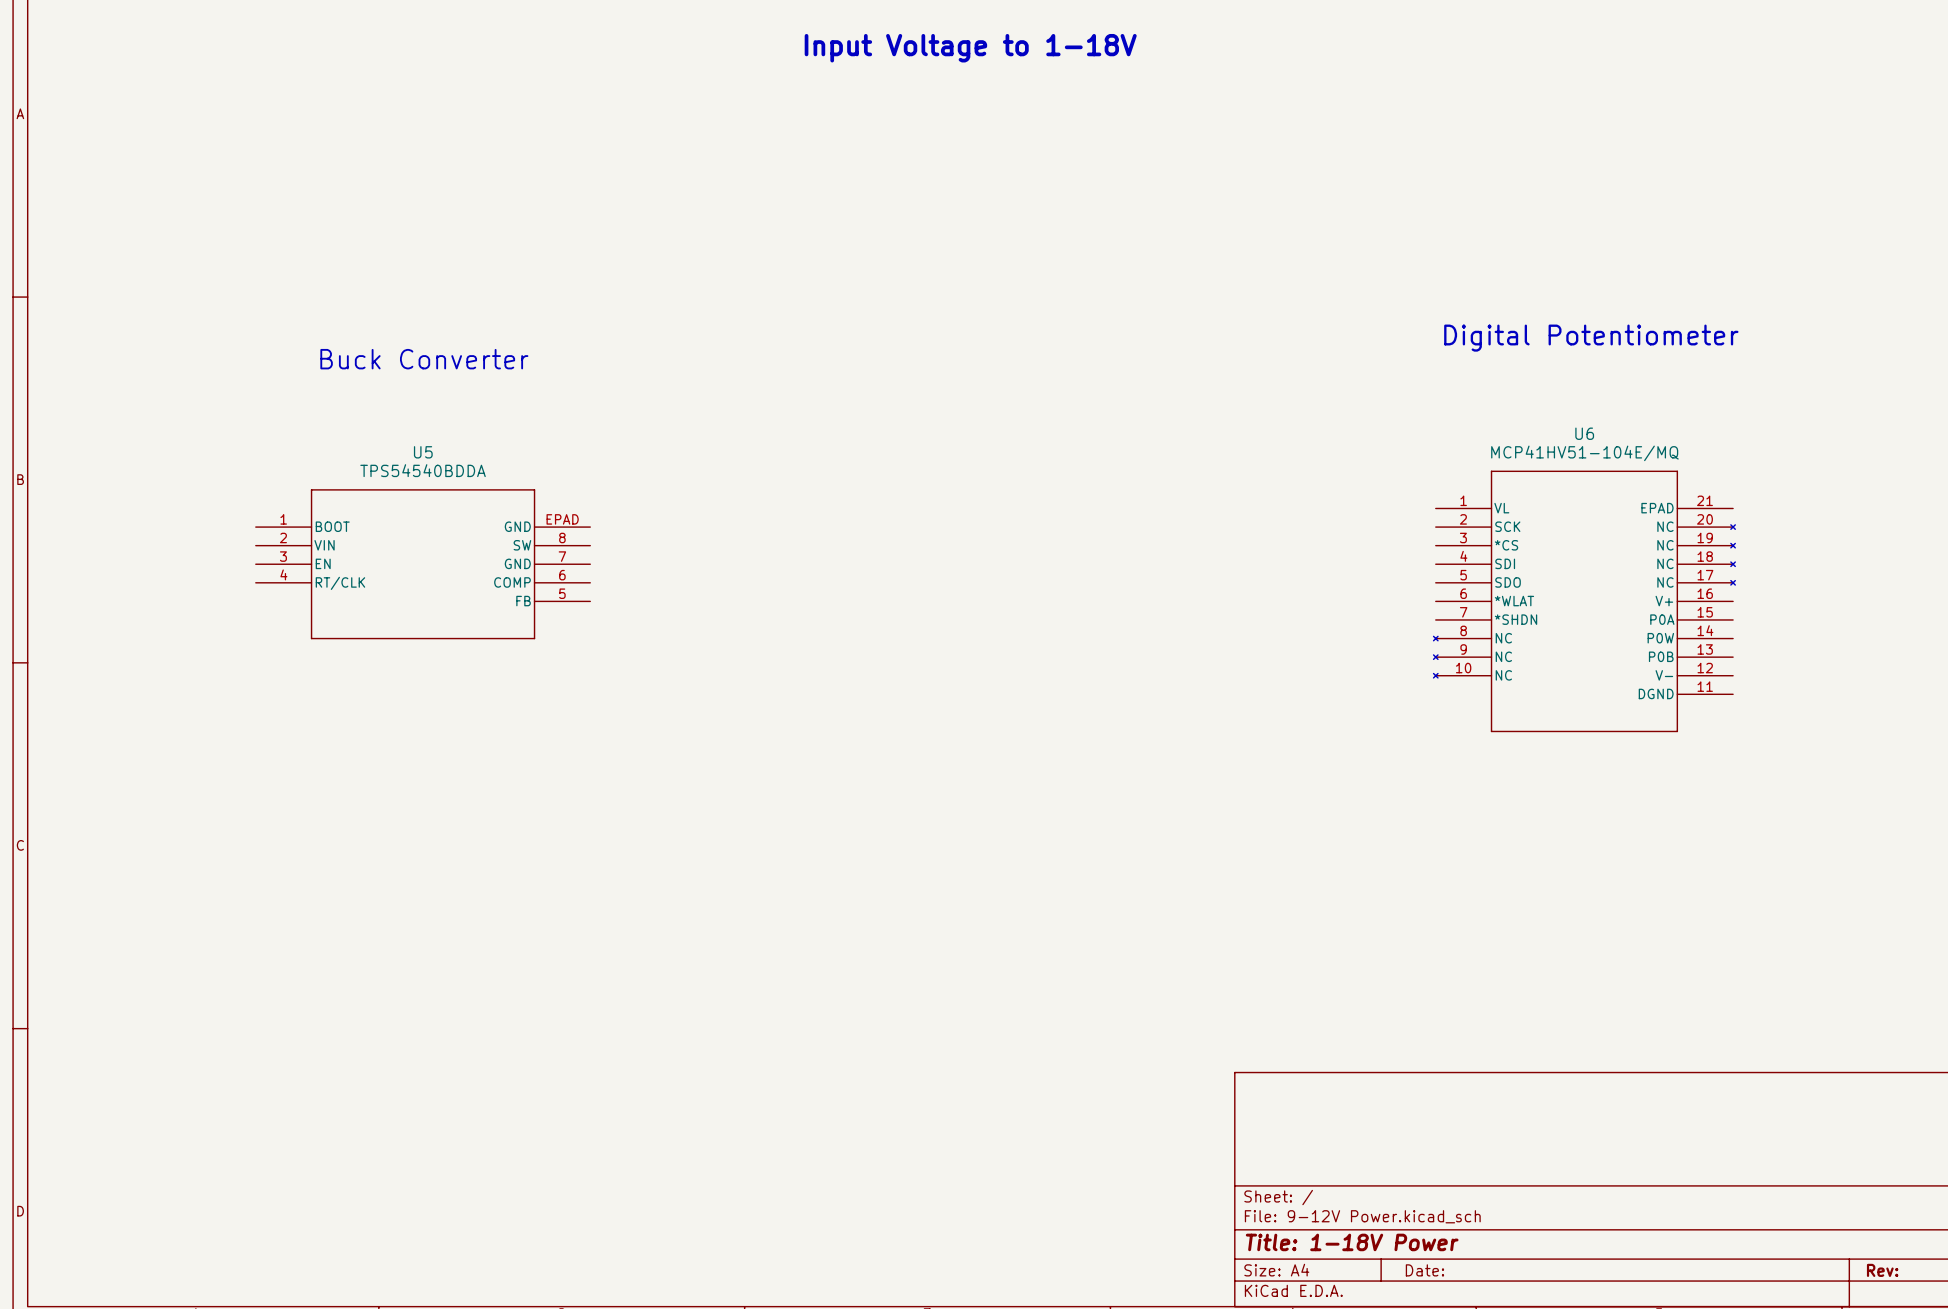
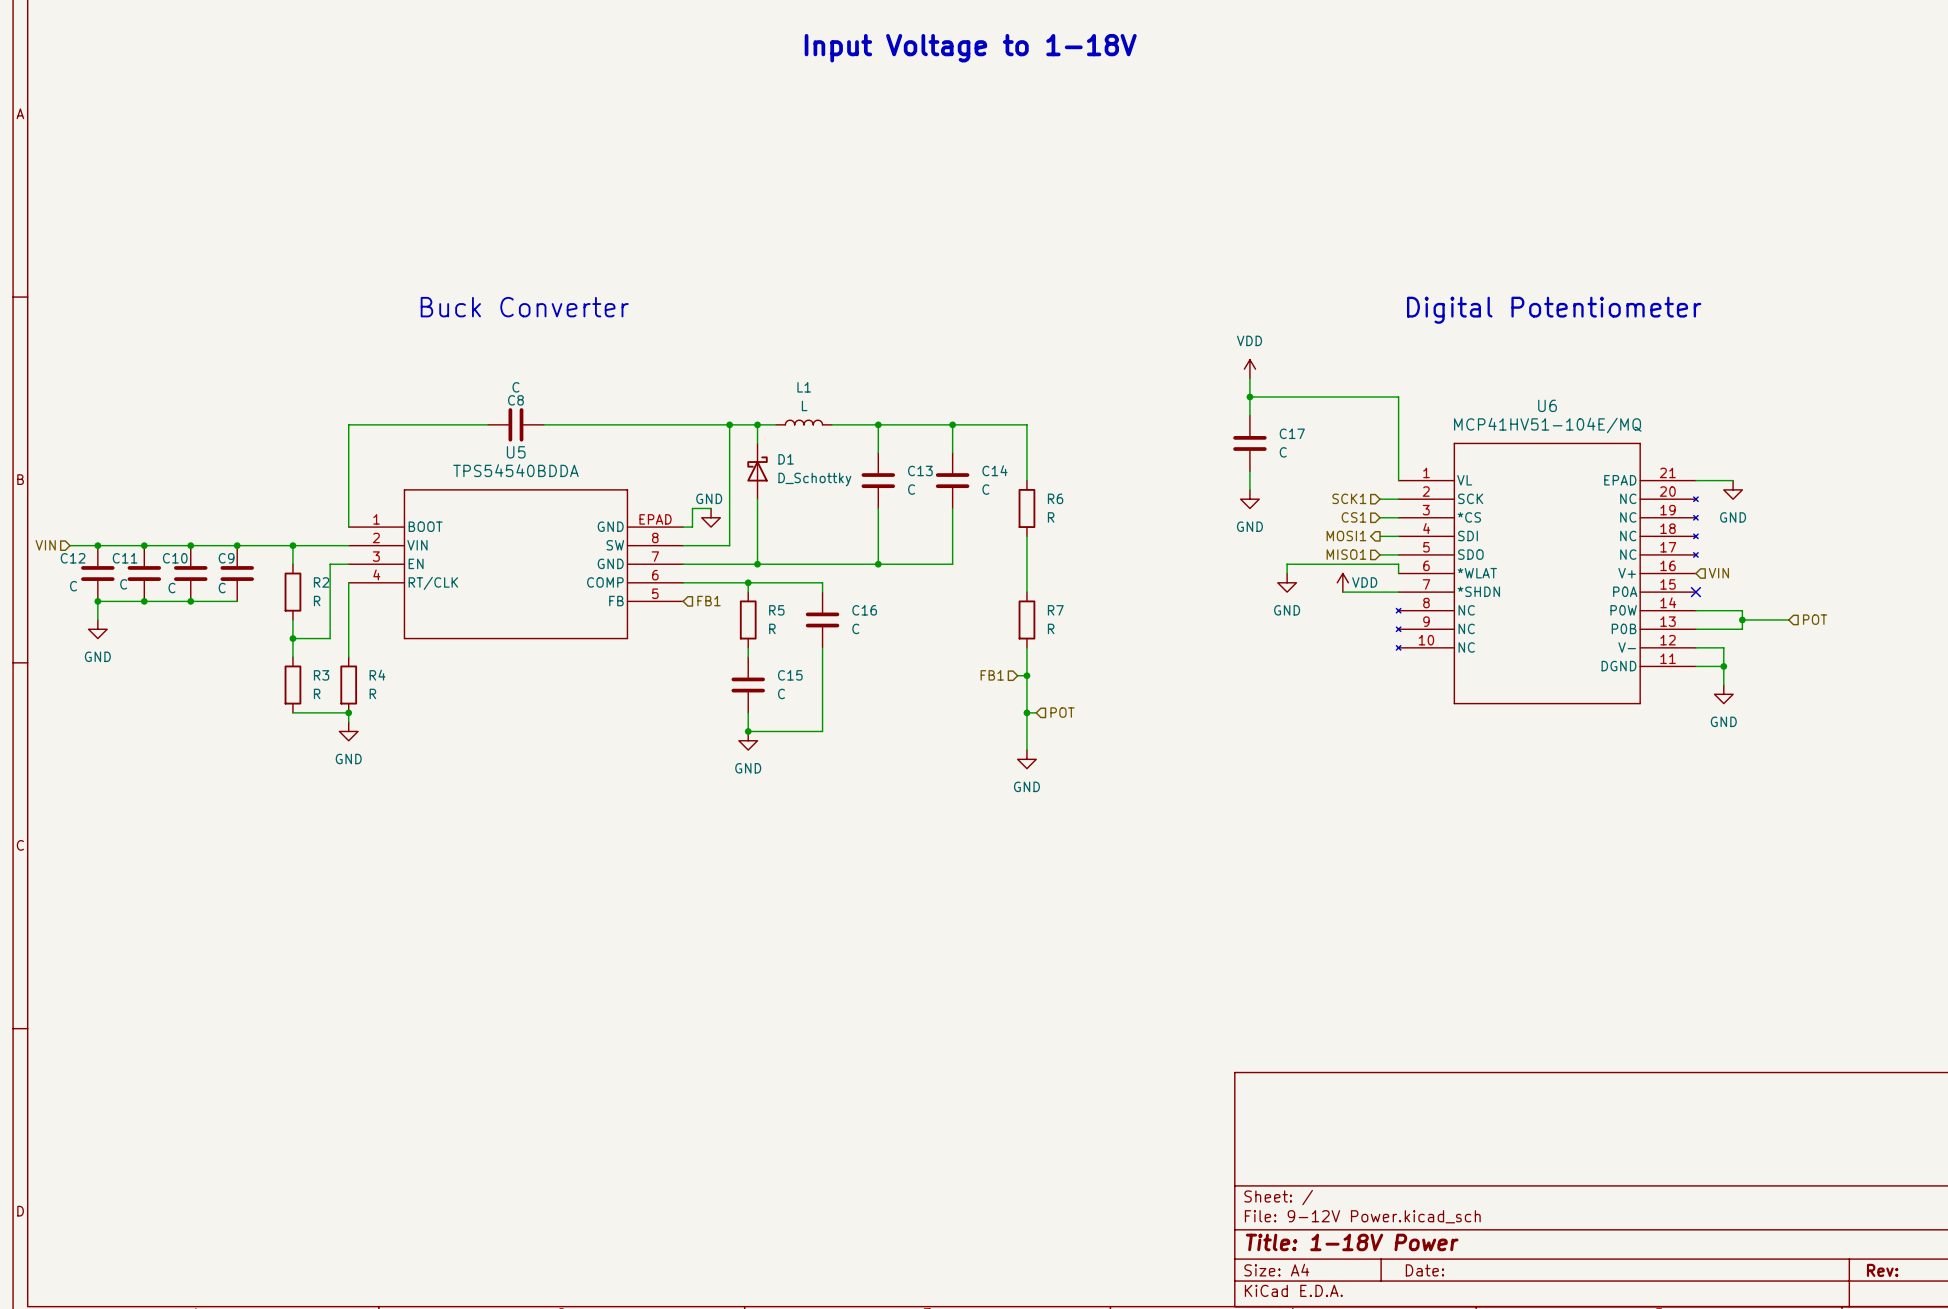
text position: Digital Potentiometer (1591, 338) -> Digital Potentiometer (1554, 310)
text position: Buck Converter (424, 359) -> Buck Converter (524, 307)
power symbol: none -> VDD (1249, 369)
wire: none -> (1249, 378) (1249, 415)
wire: none -> (1249, 396) (1398, 396) (1398, 480)
junction: none -> (1249, 396)
L1: none -> L (803, 422)
wire: none -> (488, 424) (348, 424) (348, 527)
C8: none -> C (515, 424)
wire: none -> (543, 424) (776, 424)
wire: none -> (729, 424) (729, 545) (683, 545)
junction: none -> (729, 424)
wire: none -> (757, 424) (757, 443)
junction: none -> (757, 424)
wire: none -> (831, 424) (1026, 424) (1026, 480)
wire: none -> (878, 424) (878, 452)
junction: none -> (878, 424)
wire: none -> (952, 424) (952, 452)
junction: none -> (952, 424)
C17: none -> C (1249, 443)
D1: none -> D_Schottky (757, 471)
wire: none -> (1249, 471) (1249, 489)
C13: none -> C (878, 480)
C14: none -> C (952, 480)
wire: none -> (1695, 480) (1733, 480)
power symbol: none -> GND (1733, 489)
hierarchical label: none -> SCK1 (1349, 498)
wire: none -> (757, 499) (757, 564)
power symbol: none -> GND (1249, 499)
wire: none -> (1380, 499) (1398, 499)
wire: none -> (711, 508) (692, 508) (692, 527) (683, 527)
wire: none -> (878, 508) (878, 564)
wire: none -> (952, 508) (952, 564) (683, 564)
R6: none -> R (1026, 508)
power symbol: none -> GND (711, 517)
hierarchical label: none -> CS1 (1353, 517)
wire: none -> (1380, 517) (1398, 517)
wire: none -> (1026, 536) (1026, 592)
hierarchical label: none -> MOSI1 (1346, 536)
wire: none -> (1380, 536) (1398, 536)
hierarchical label: none -> VIN (45, 545)
wire: none -> (69, 545) (348, 545)
junction: none -> (97, 545)
junction: none -> (144, 545)
junction: none -> (190, 545)
junction: none -> (237, 545)
wire: none -> (292, 545) (292, 564)
junction: none -> (292, 545)
hierarchical label: none -> MISO1 (1346, 554)
wire: none -> (1380, 554) (1398, 554)
wire: none -> (348, 564) (330, 564) (330, 638) (292, 638)
U5 position: (423, 564) -> (515, 564)
junction: none -> (757, 564)
junction: none -> (878, 564)
C12: none -> C (97, 573)
C11: none -> C (144, 573)
C10: none -> C (190, 573)
C9: none -> C (237, 573)
wire: none -> (1287, 573) (1287, 564) (1398, 564) (1398, 573)
hierarchical label: none -> VIN (1718, 573)
wire: none -> (348, 582) (348, 657)
wire: none -> (683, 582) (822, 582) (822, 592)
wire: none -> (748, 582) (748, 592)
junction: none -> (748, 582)
power symbol: none -> GND (1287, 582)
power symbol: none -> VDD (1342, 582)
R2: none -> R (292, 592)
wire: none -> (1342, 592) (1398, 592)
no-connect mark: none -> (1695, 592)
junction: none -> (97, 601)
junction: none -> (144, 601)
junction: none -> (190, 601)
wire: none -> (237, 601) (97, 601) (97, 619)
hierarchical label: none -> FB1 (709, 601)
U6 position: (1584, 601) -> (1547, 573)
wire: none -> (1695, 610) (1742, 610) (1742, 629) (1695, 629)
wire: none -> (292, 619) (292, 657)
R5: none -> R (748, 619)
C16: none -> C (822, 619)
R7: none -> R (1026, 619)
wire: none -> (1742, 619) (1788, 619)
junction: none -> (1742, 619)
hierarchical label: none -> POT (1815, 619)
power symbol: none -> GND (97, 629)
junction: none -> (292, 638)
wire: none -> (748, 647) (748, 657)
wire: none -> (822, 647) (822, 731) (748, 731) (748, 712)
wire: none -> (1026, 647) (1026, 750)
wire: none -> (1695, 647) (1723, 647) (1723, 685)
wire: none -> (1695, 666) (1723, 666)
junction: none -> (1723, 666)
hierarchical label: none -> FB1 (992, 675)
wire: none -> (1017, 675) (1026, 675)
junction: none -> (1026, 675)
R3: none -> R (292, 685)
R4: none -> R (348, 685)
C15: none -> C (748, 685)
power symbol: none -> GND (1723, 694)
wire: none -> (292, 712) (348, 712) (348, 722)
junction: none -> (348, 712)
wire: none -> (1026, 712) (1036, 712)
junction: none -> (1026, 712)
hierarchical label: none -> POT (1062, 712)
power symbol: none -> GND (348, 731)
junction: none -> (748, 731)
power symbol: none -> GND (748, 740)
power symbol: none -> GND (1026, 759)

